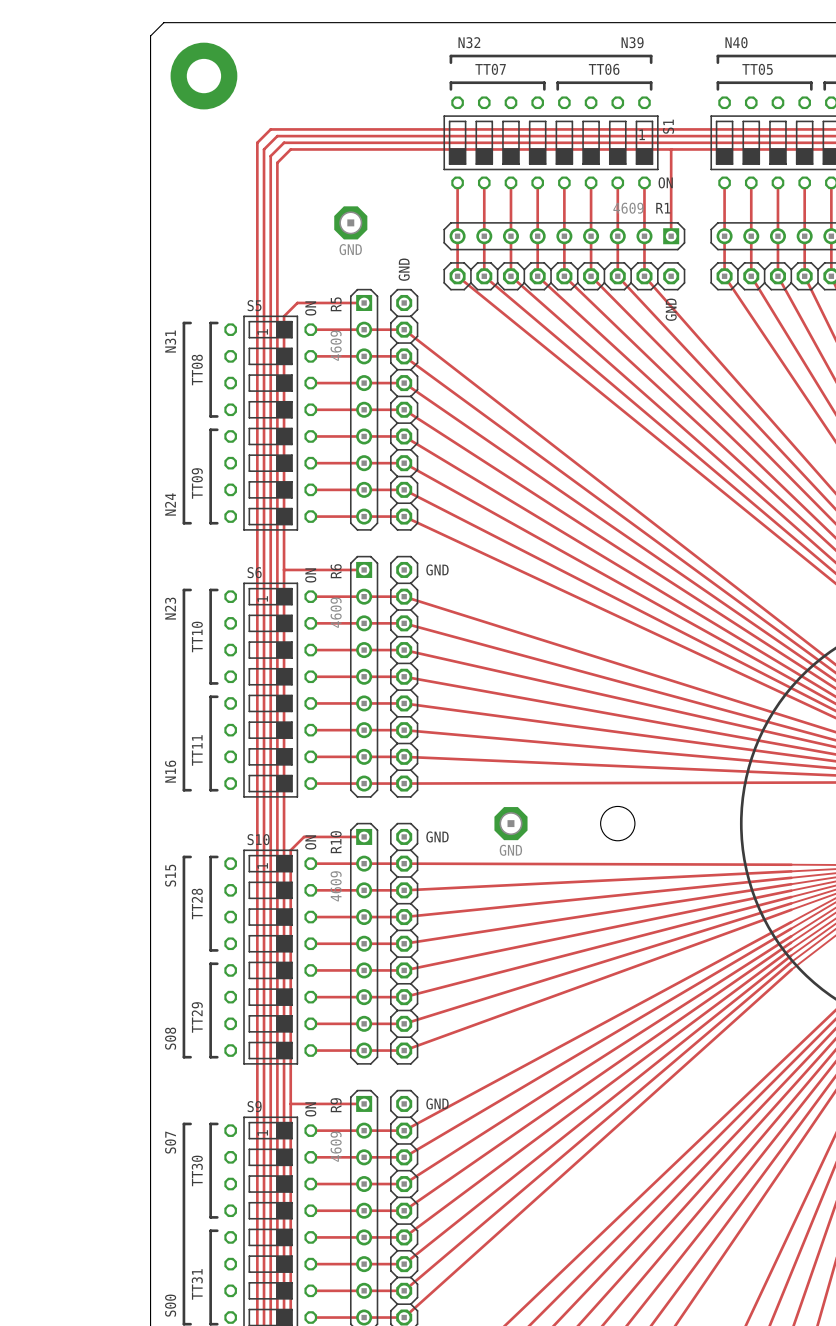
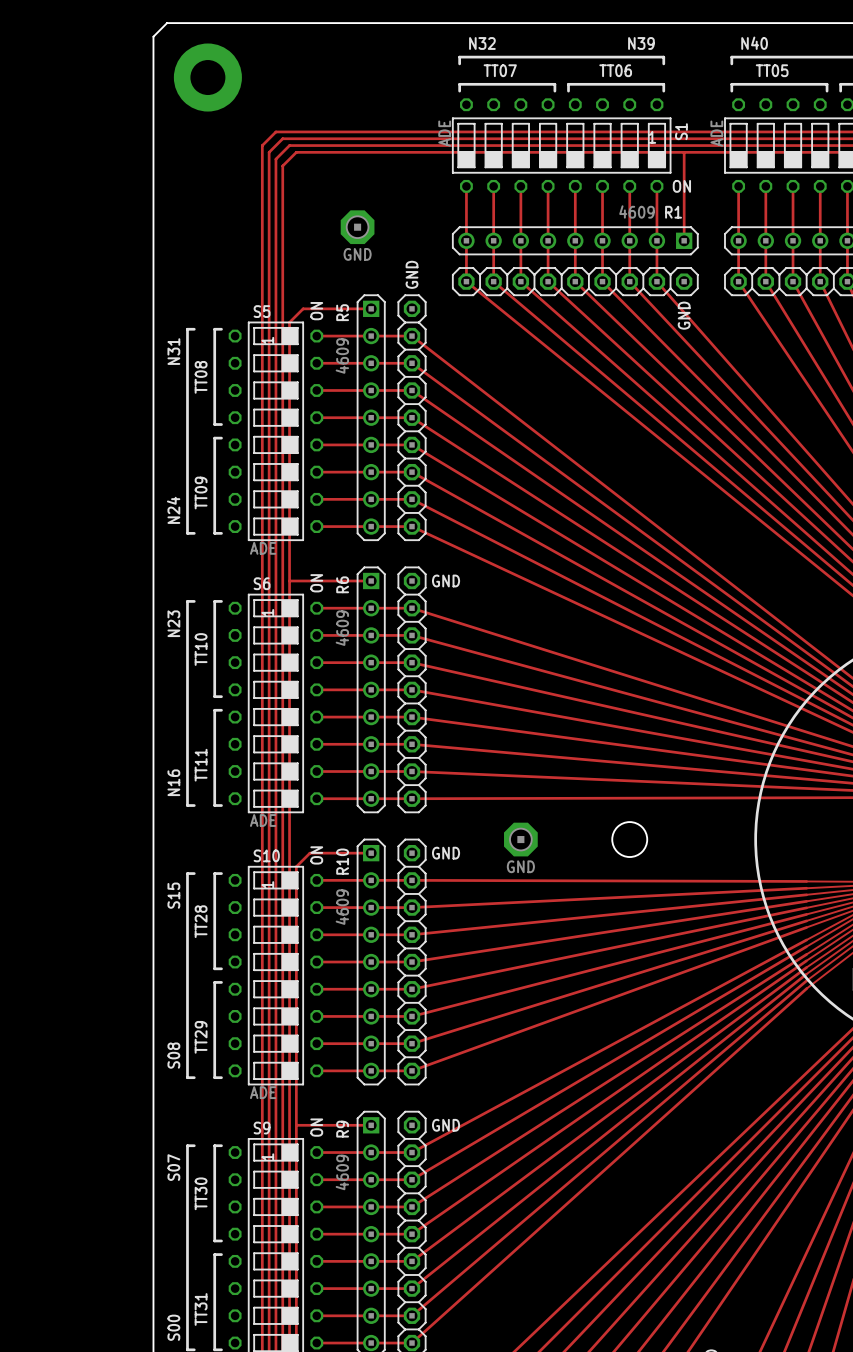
S1 value: none -> ADE (444, 133)
part value: none -> ADE (716, 133)
S5 value: none -> ADE (263, 548)
S6 value: none -> ADE (263, 820)
S10 value: none -> ADE (263, 1092)

